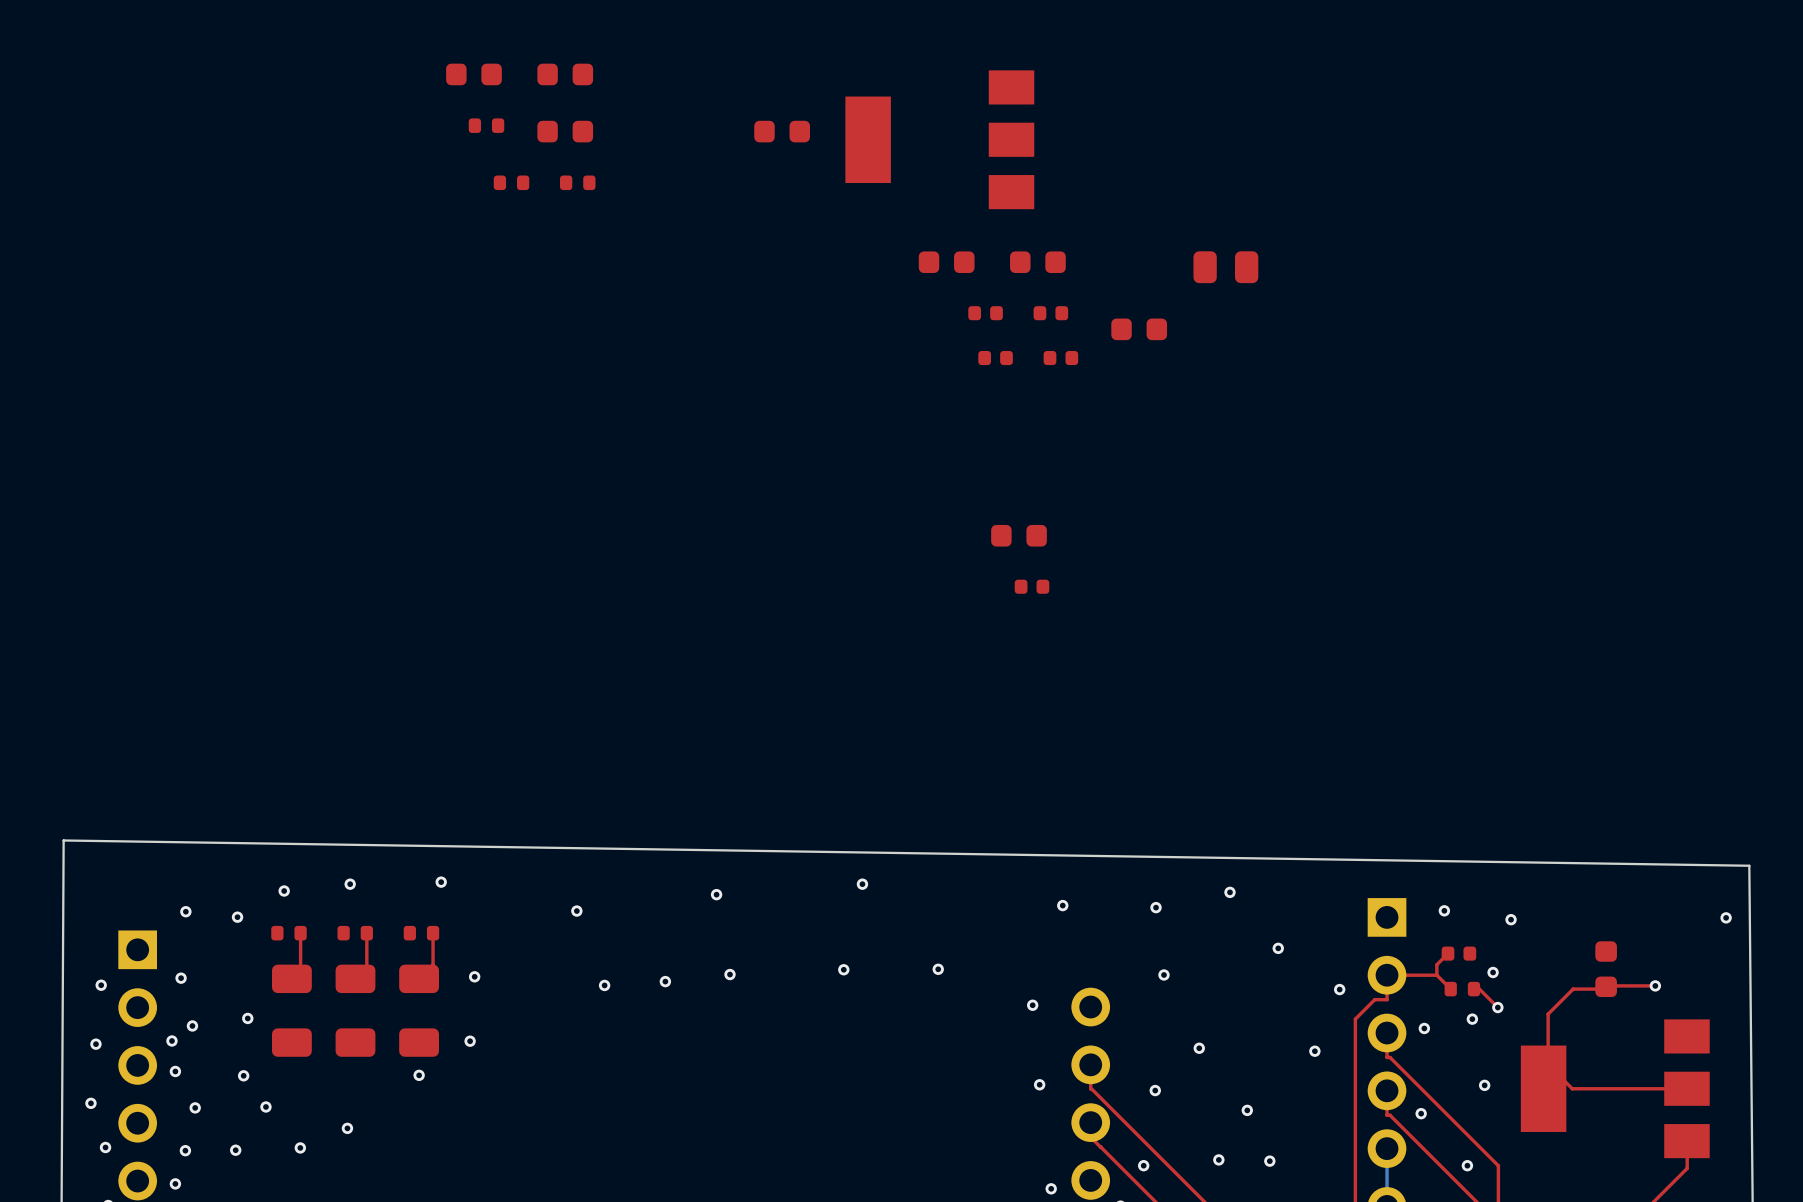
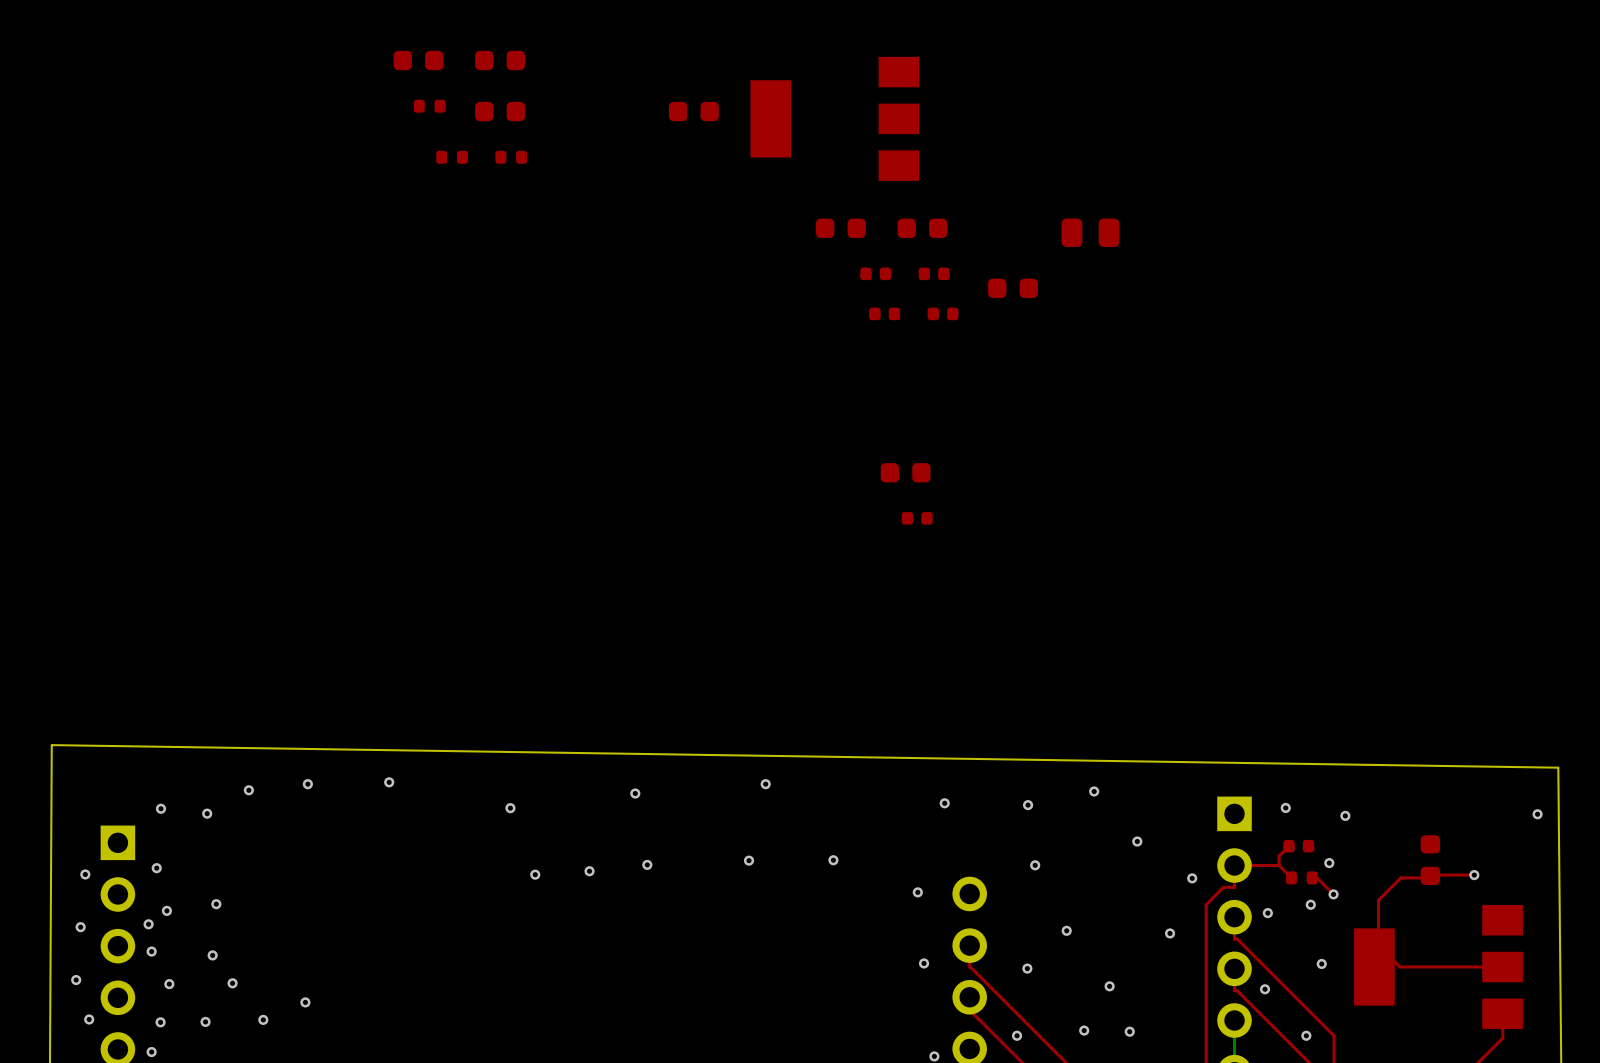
part: (289, 933) -> none
top track: (300, 933) (300, 970) (291, 978) -> none
part: (355, 933) -> none
top track: (366, 933) (366, 967) (355, 978) -> none
part: (421, 933) -> none
top track: (433, 933) (433, 964) (419, 978) -> none
via: (474, 976) -> none
part: (291, 1010) -> none
part: (355, 1010) -> none
part: (419, 1010) -> none
via: (470, 1041) -> none
via: (419, 1075) -> none

